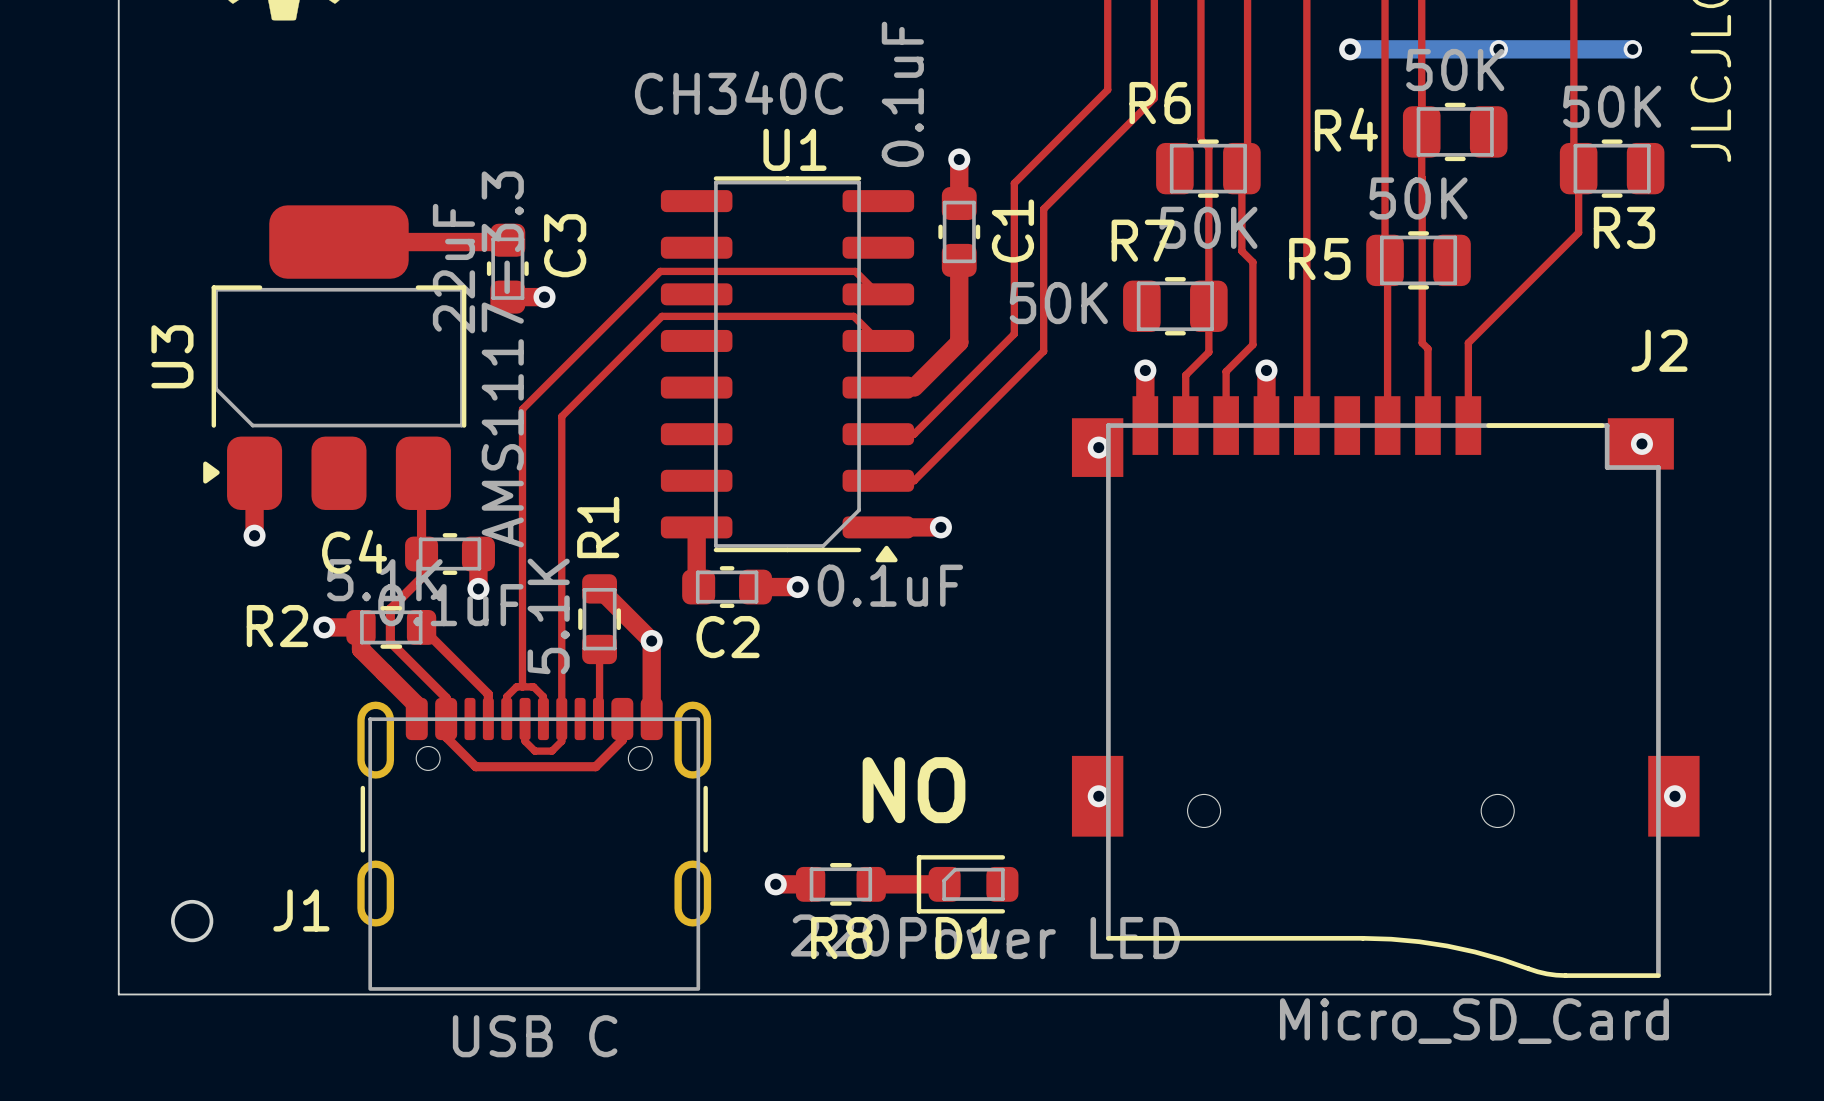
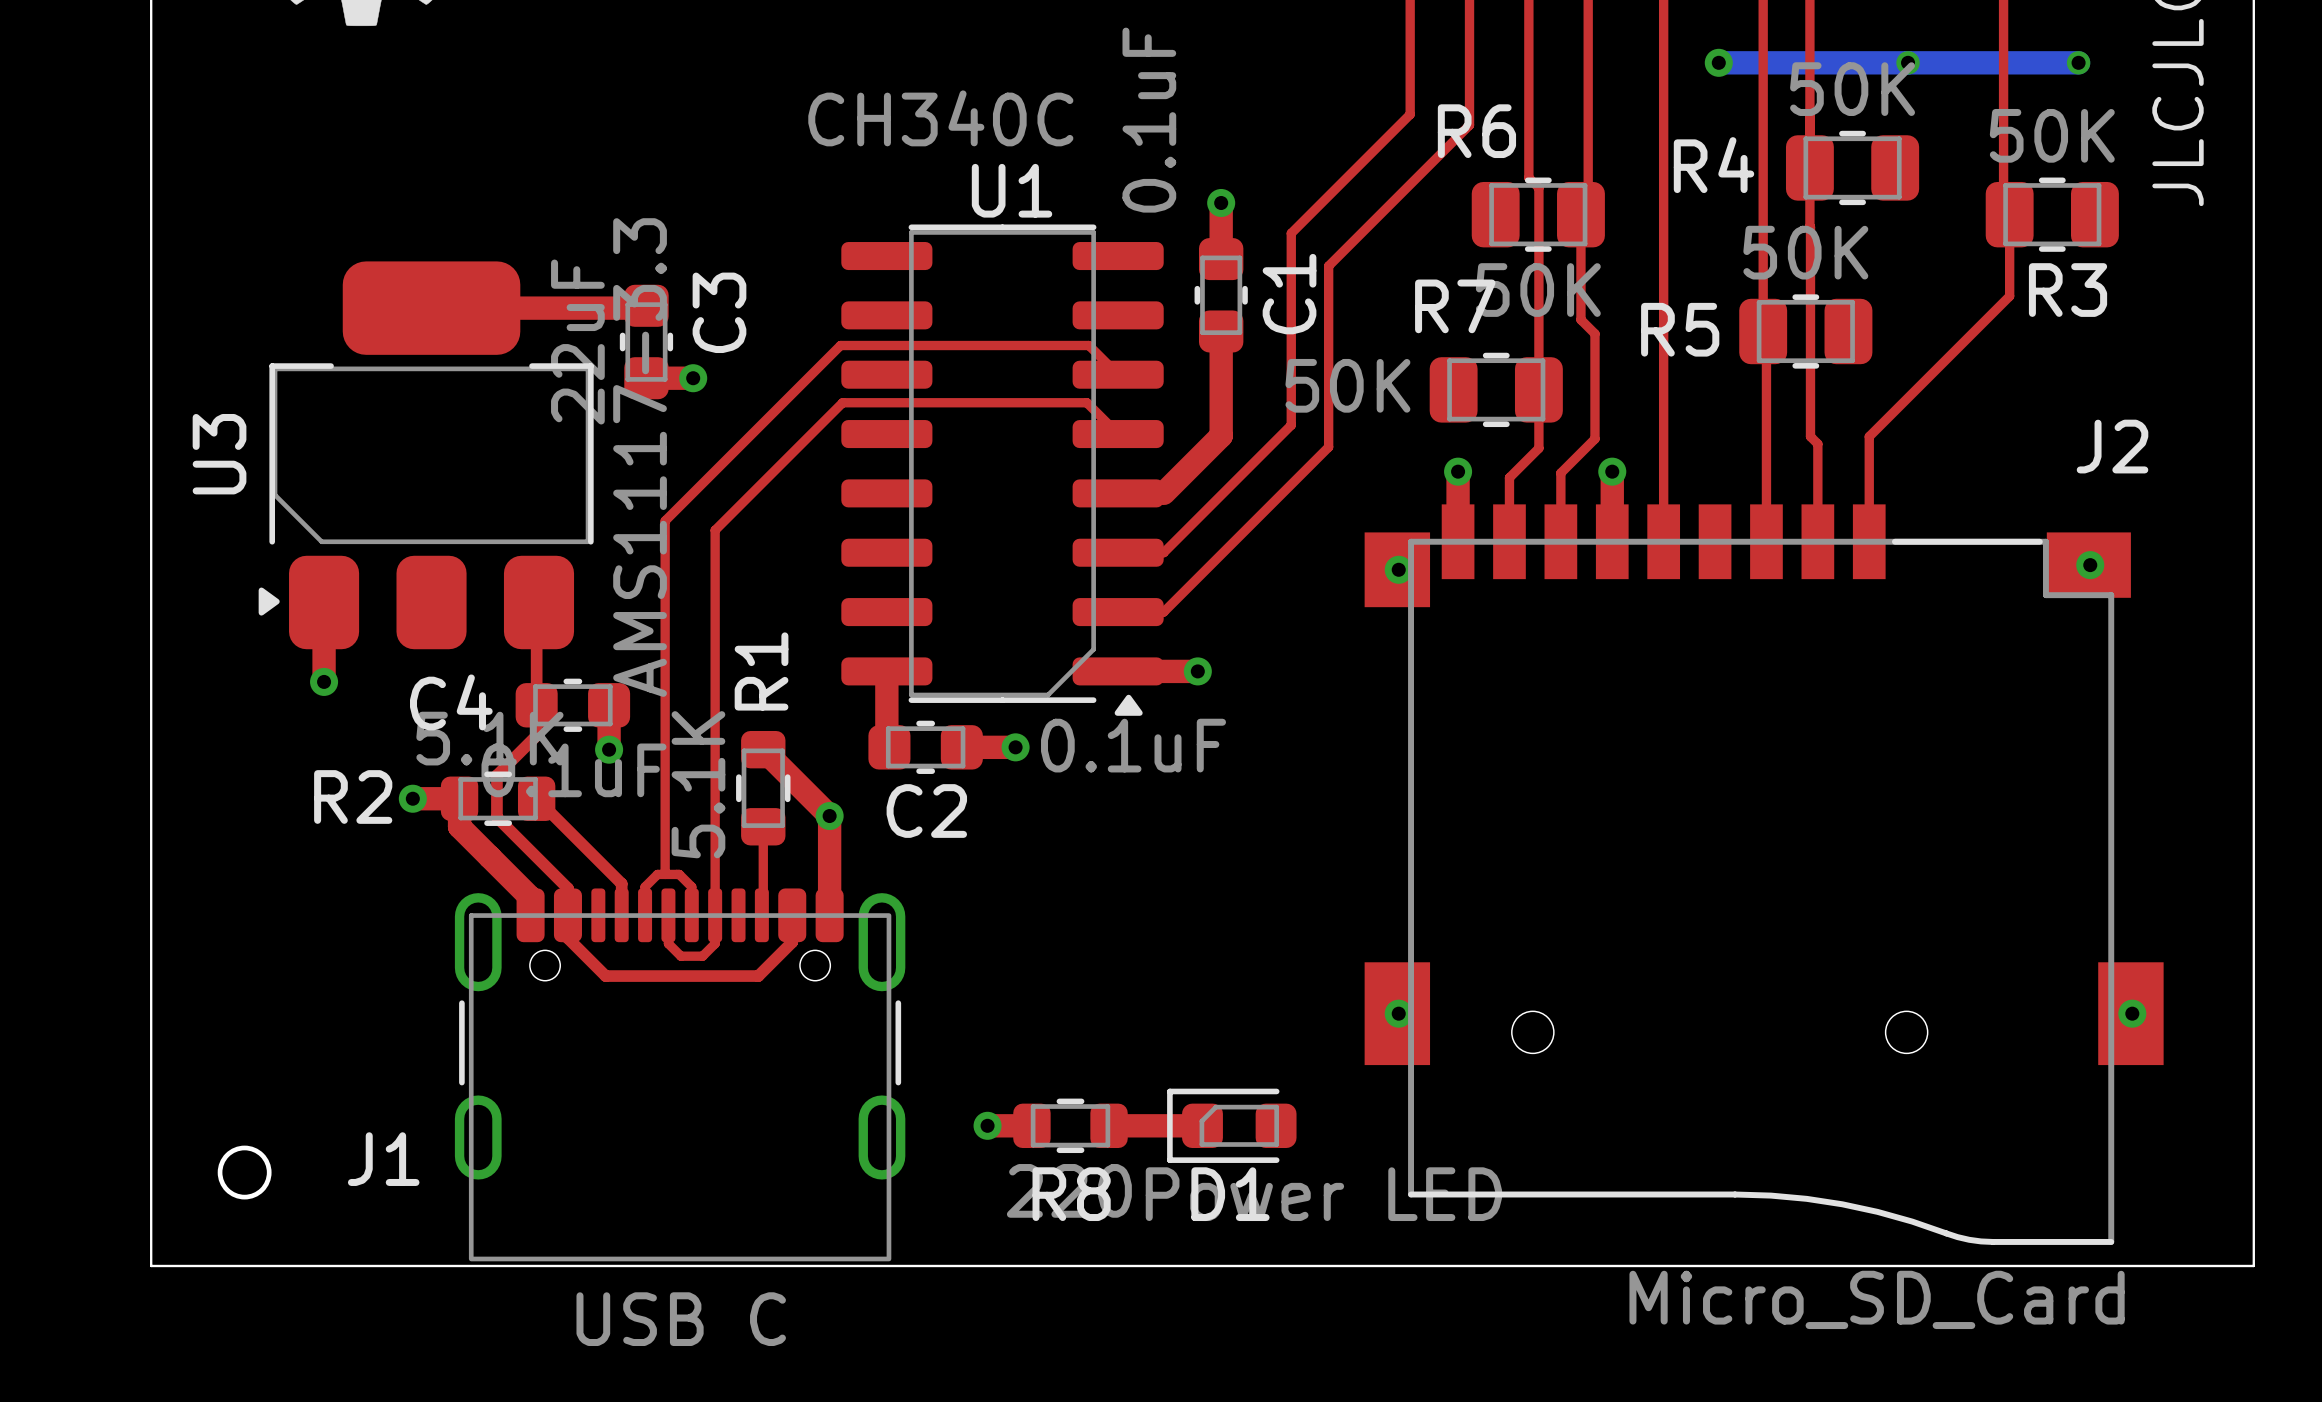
text: ON (914, 790) -> none

